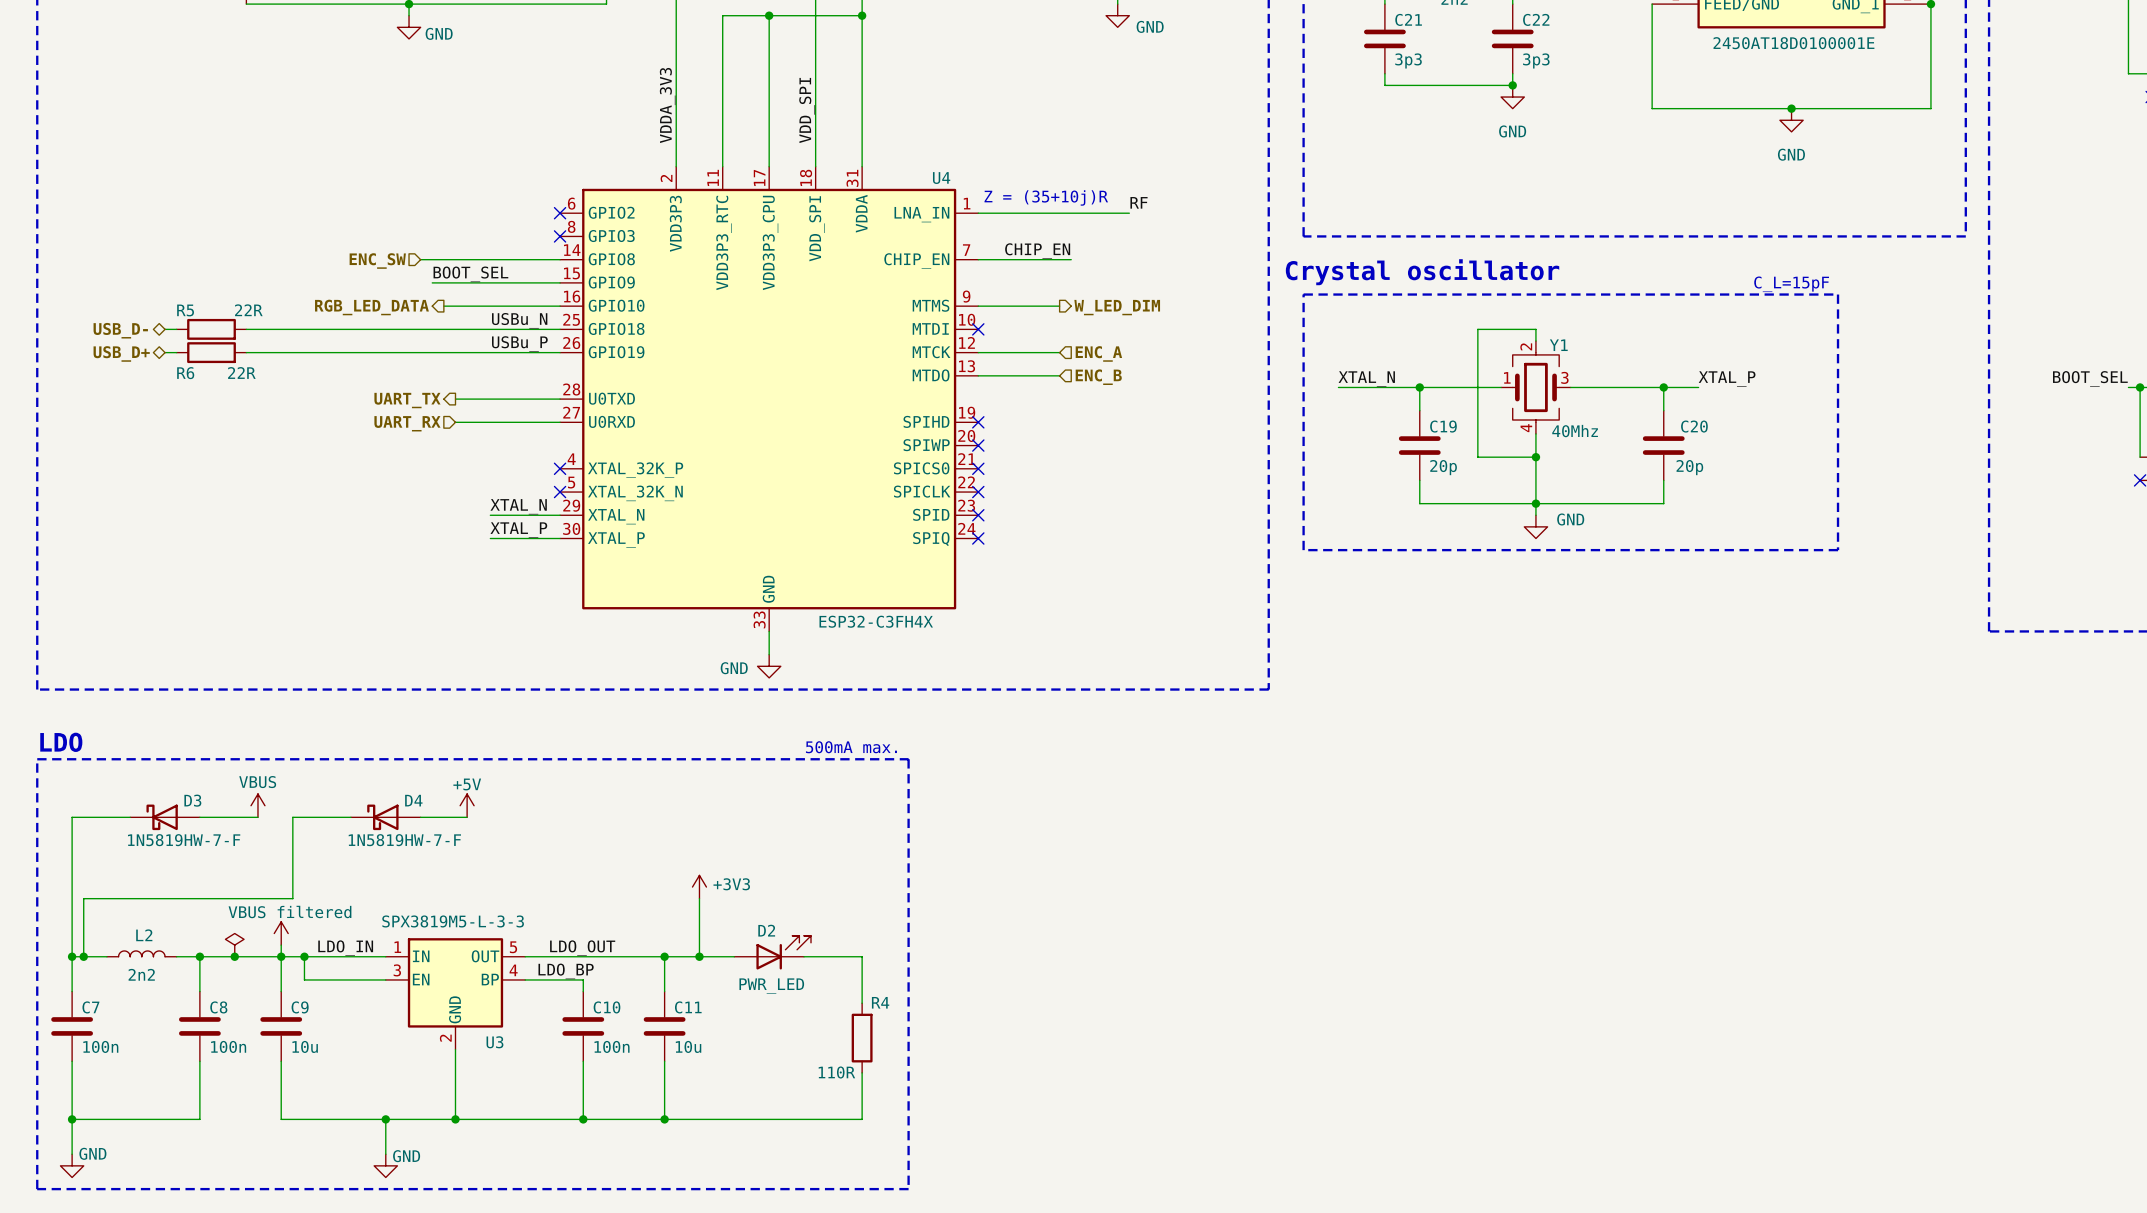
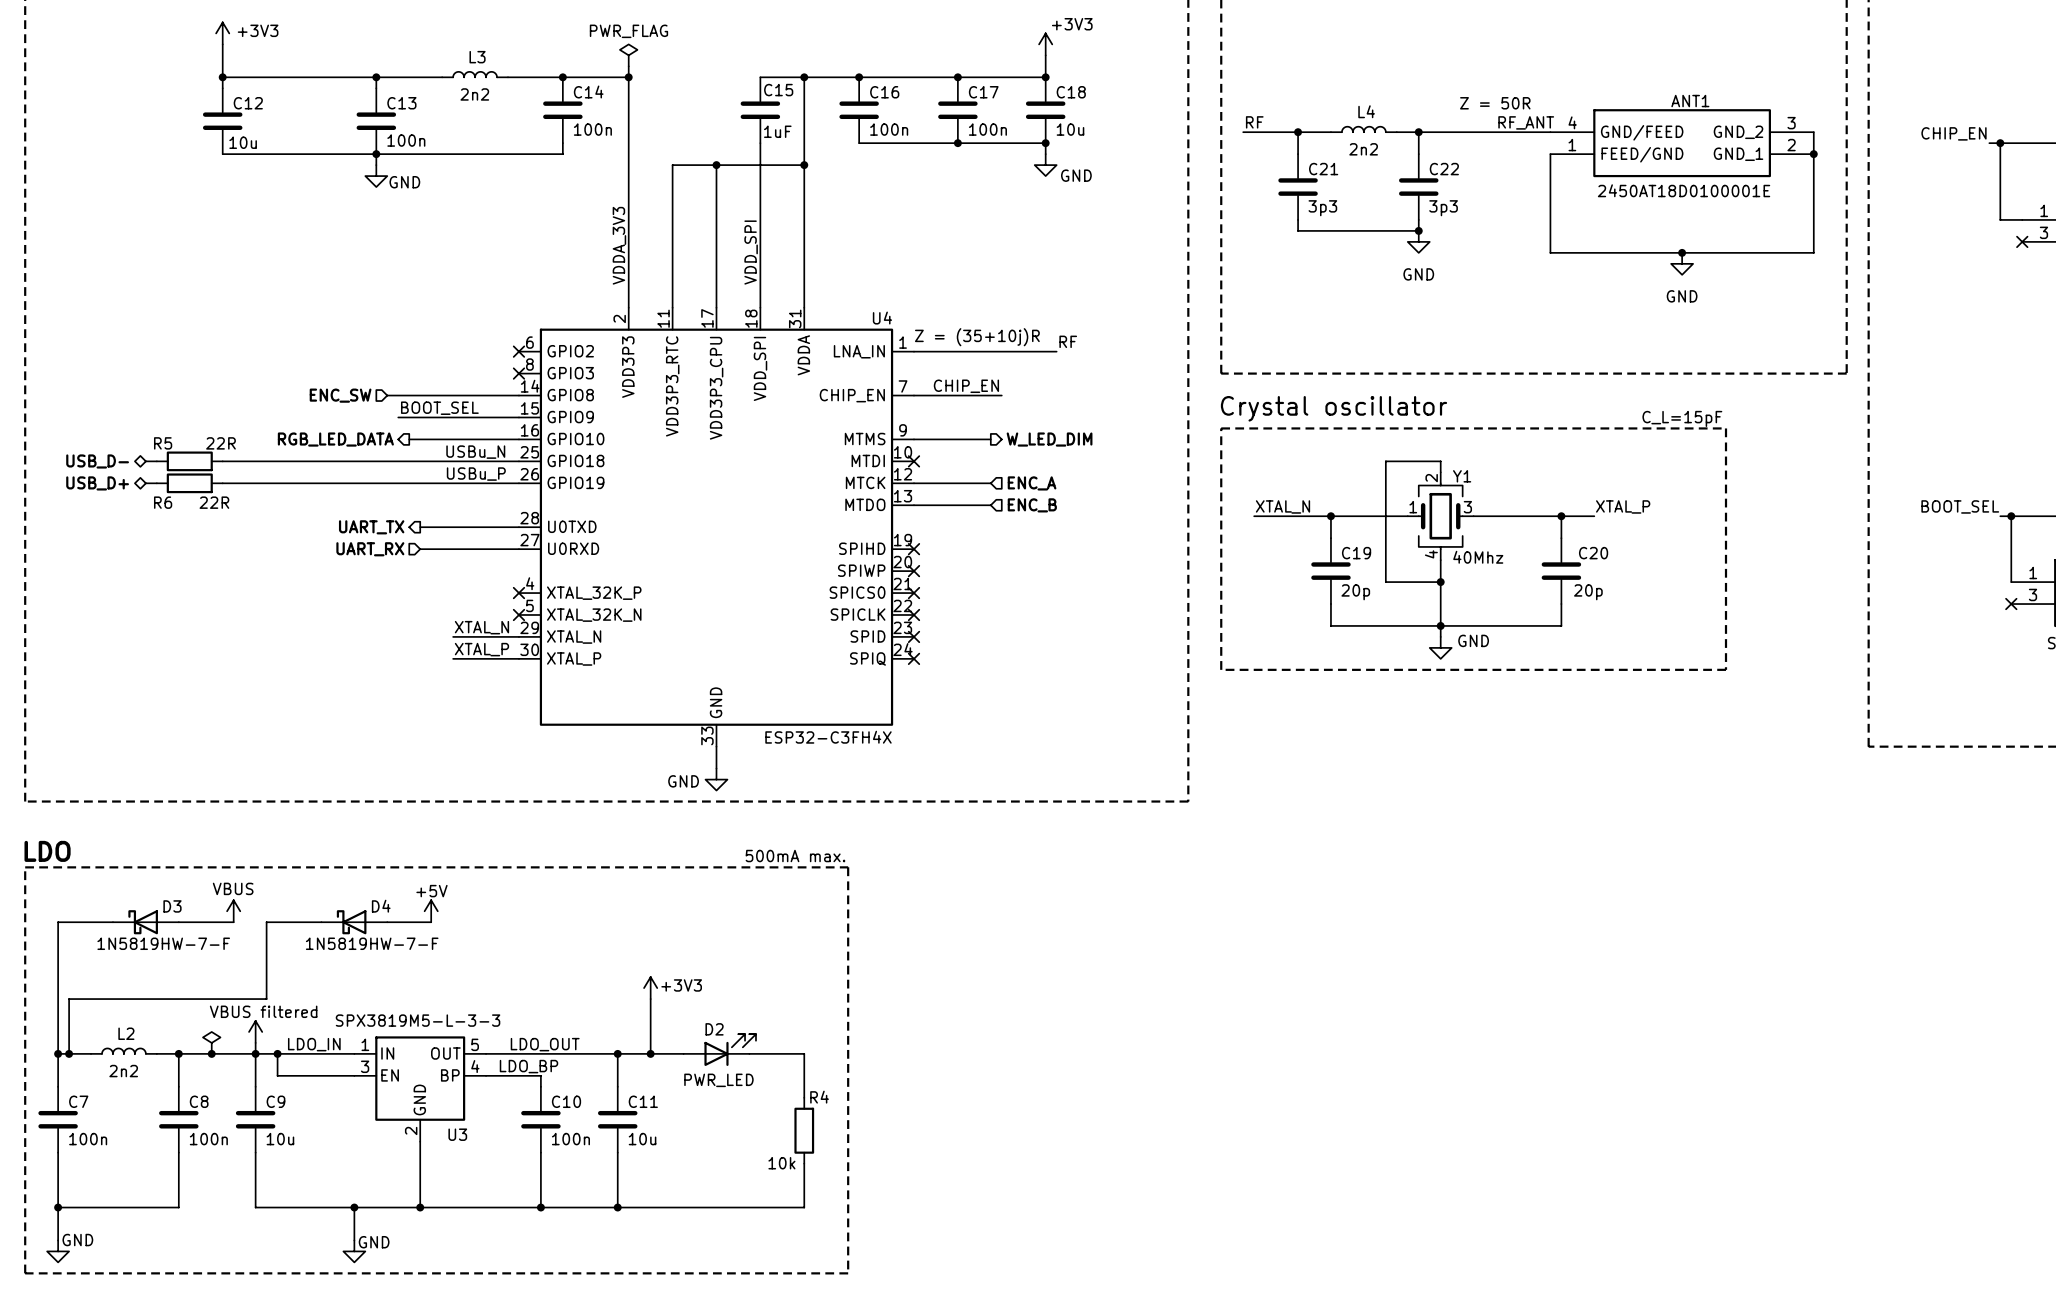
R4 value: 110R (836, 1072) -> 10k (781, 1163)

